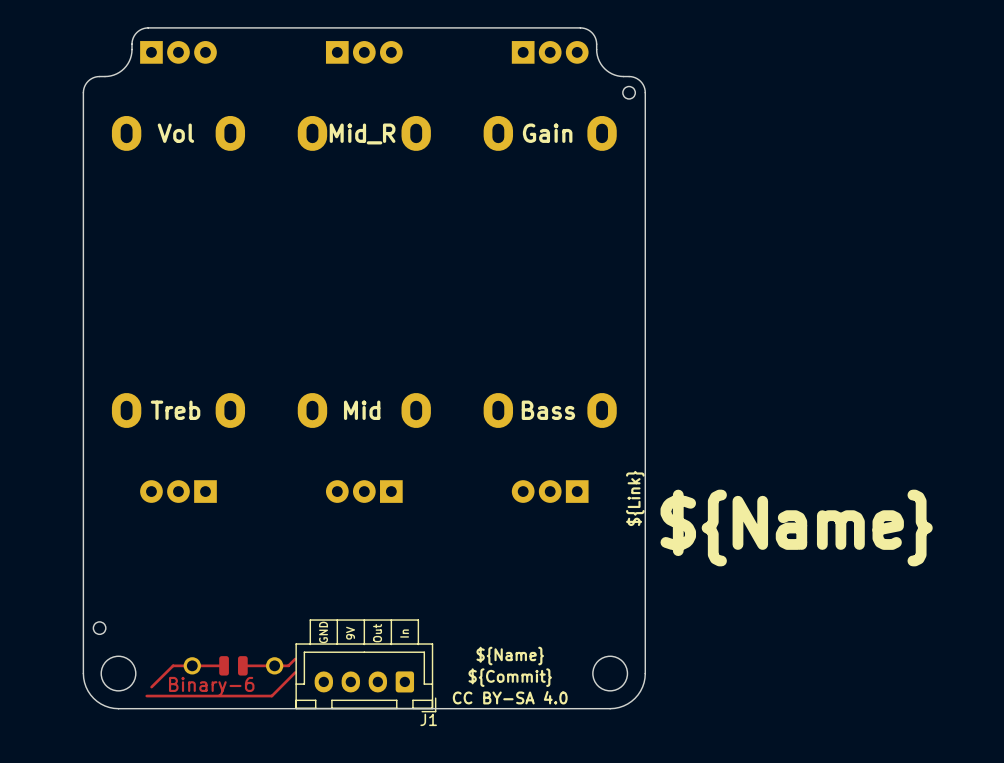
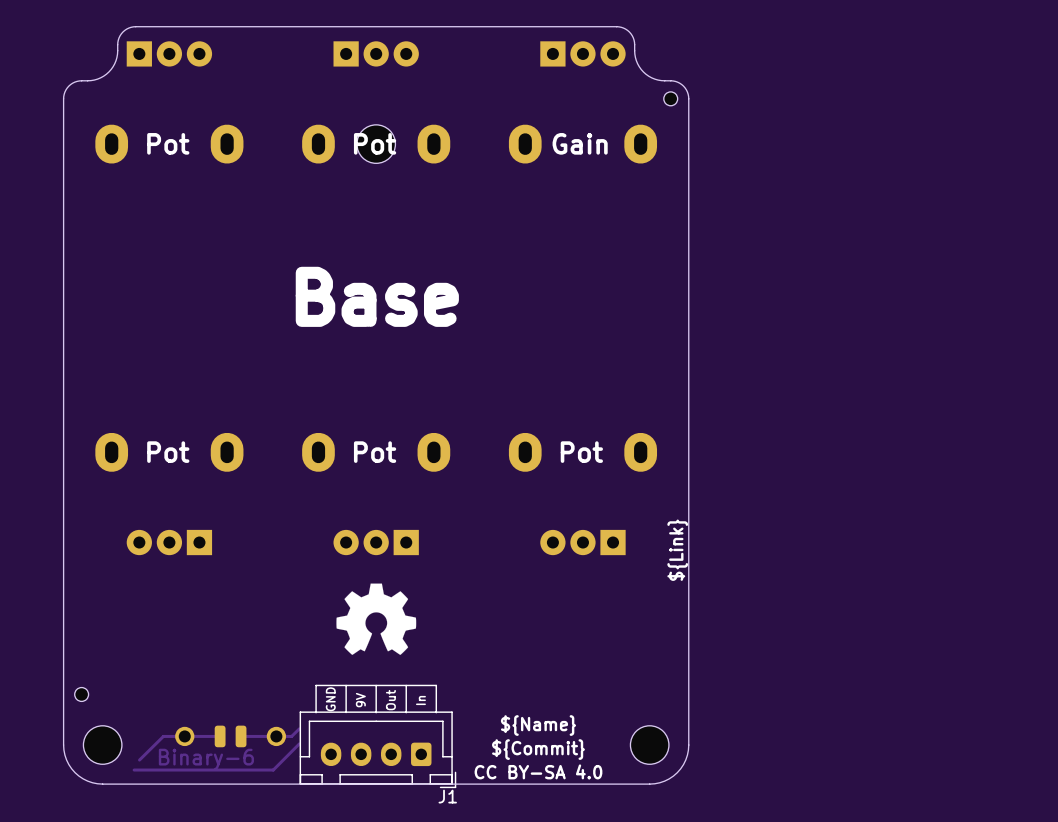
text: Vol (175, 133) -> Pot (168, 143)
text: Mid_R (362, 133) -> Pot (375, 143)
part: none -> (376, 144)
text: none -> Base (377, 296)
text: Treb (175, 410) -> Pot (168, 452)
text: Mid (362, 410) -> Pot (375, 452)
text: Bass (548, 410) -> Pot (581, 452)
drawing: none -> [336, 583, 417, 655]
text: ${Name} (796, 528) -> none

